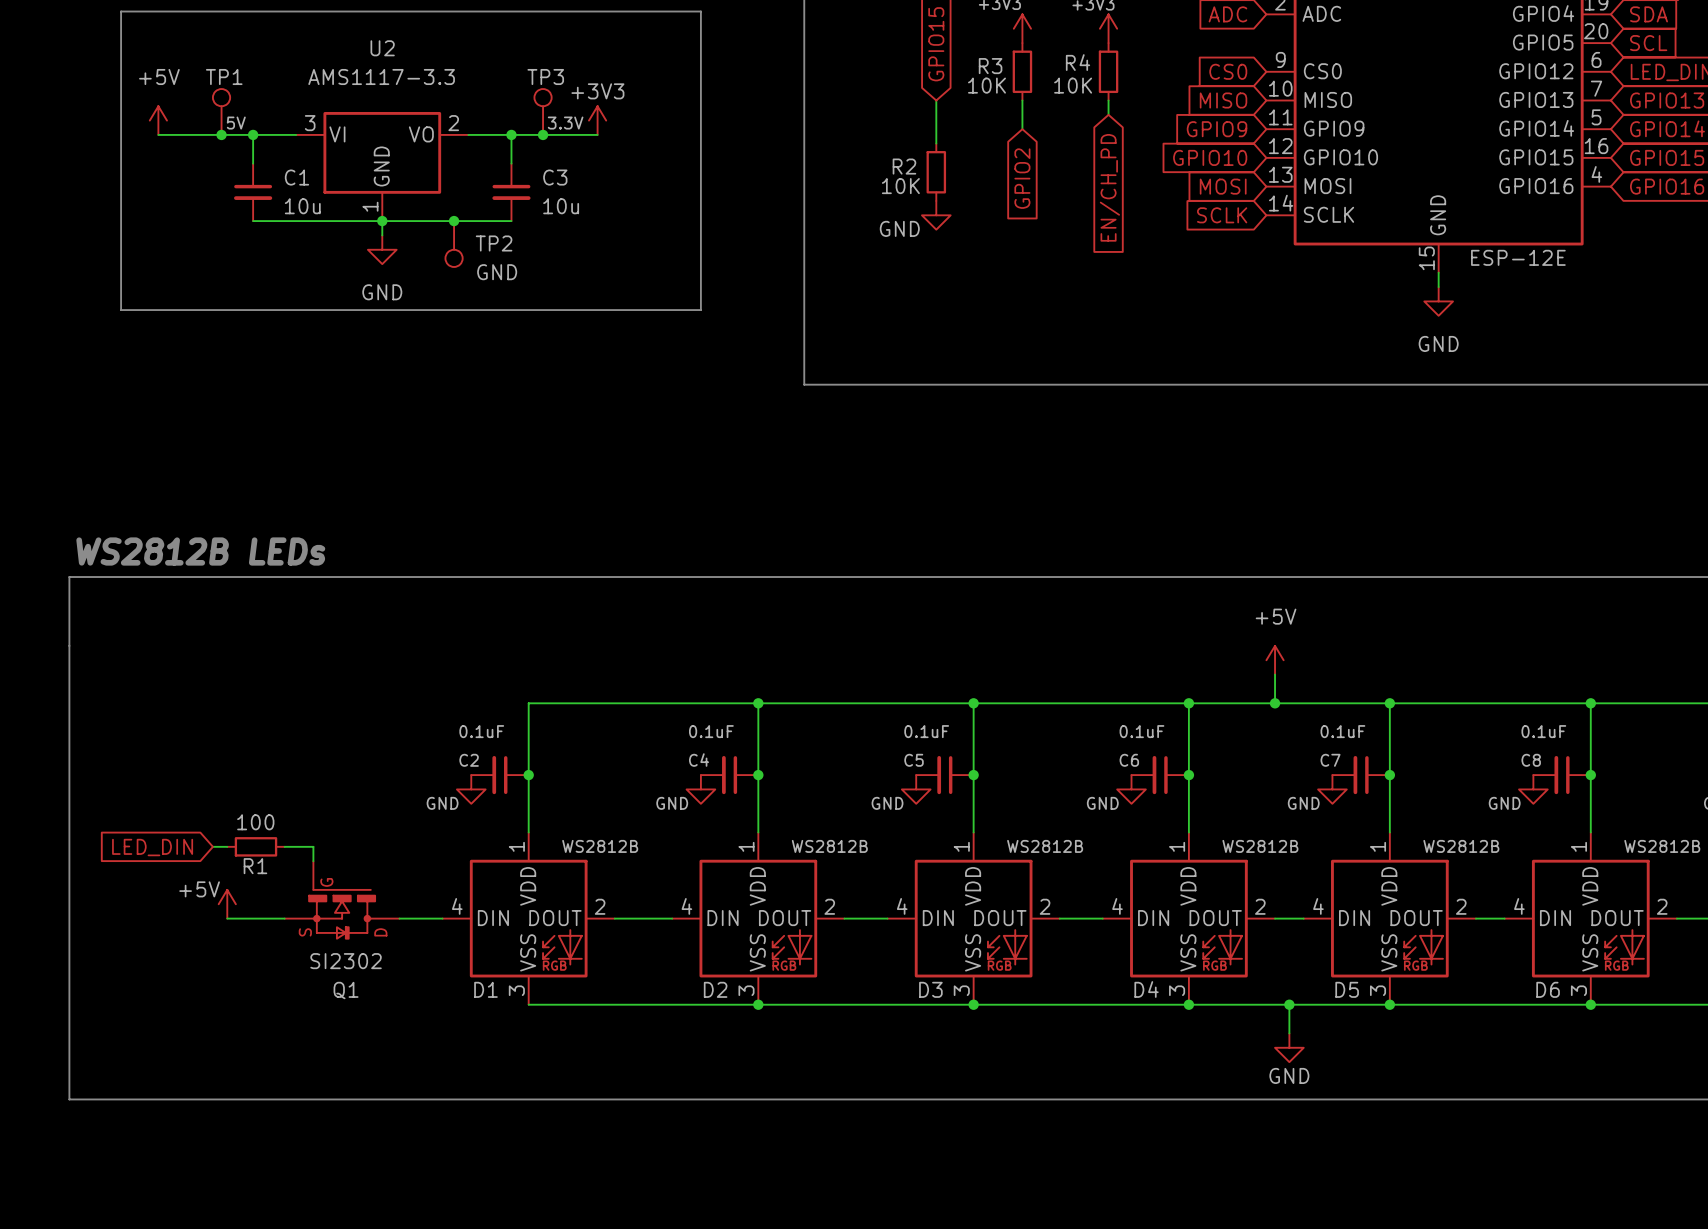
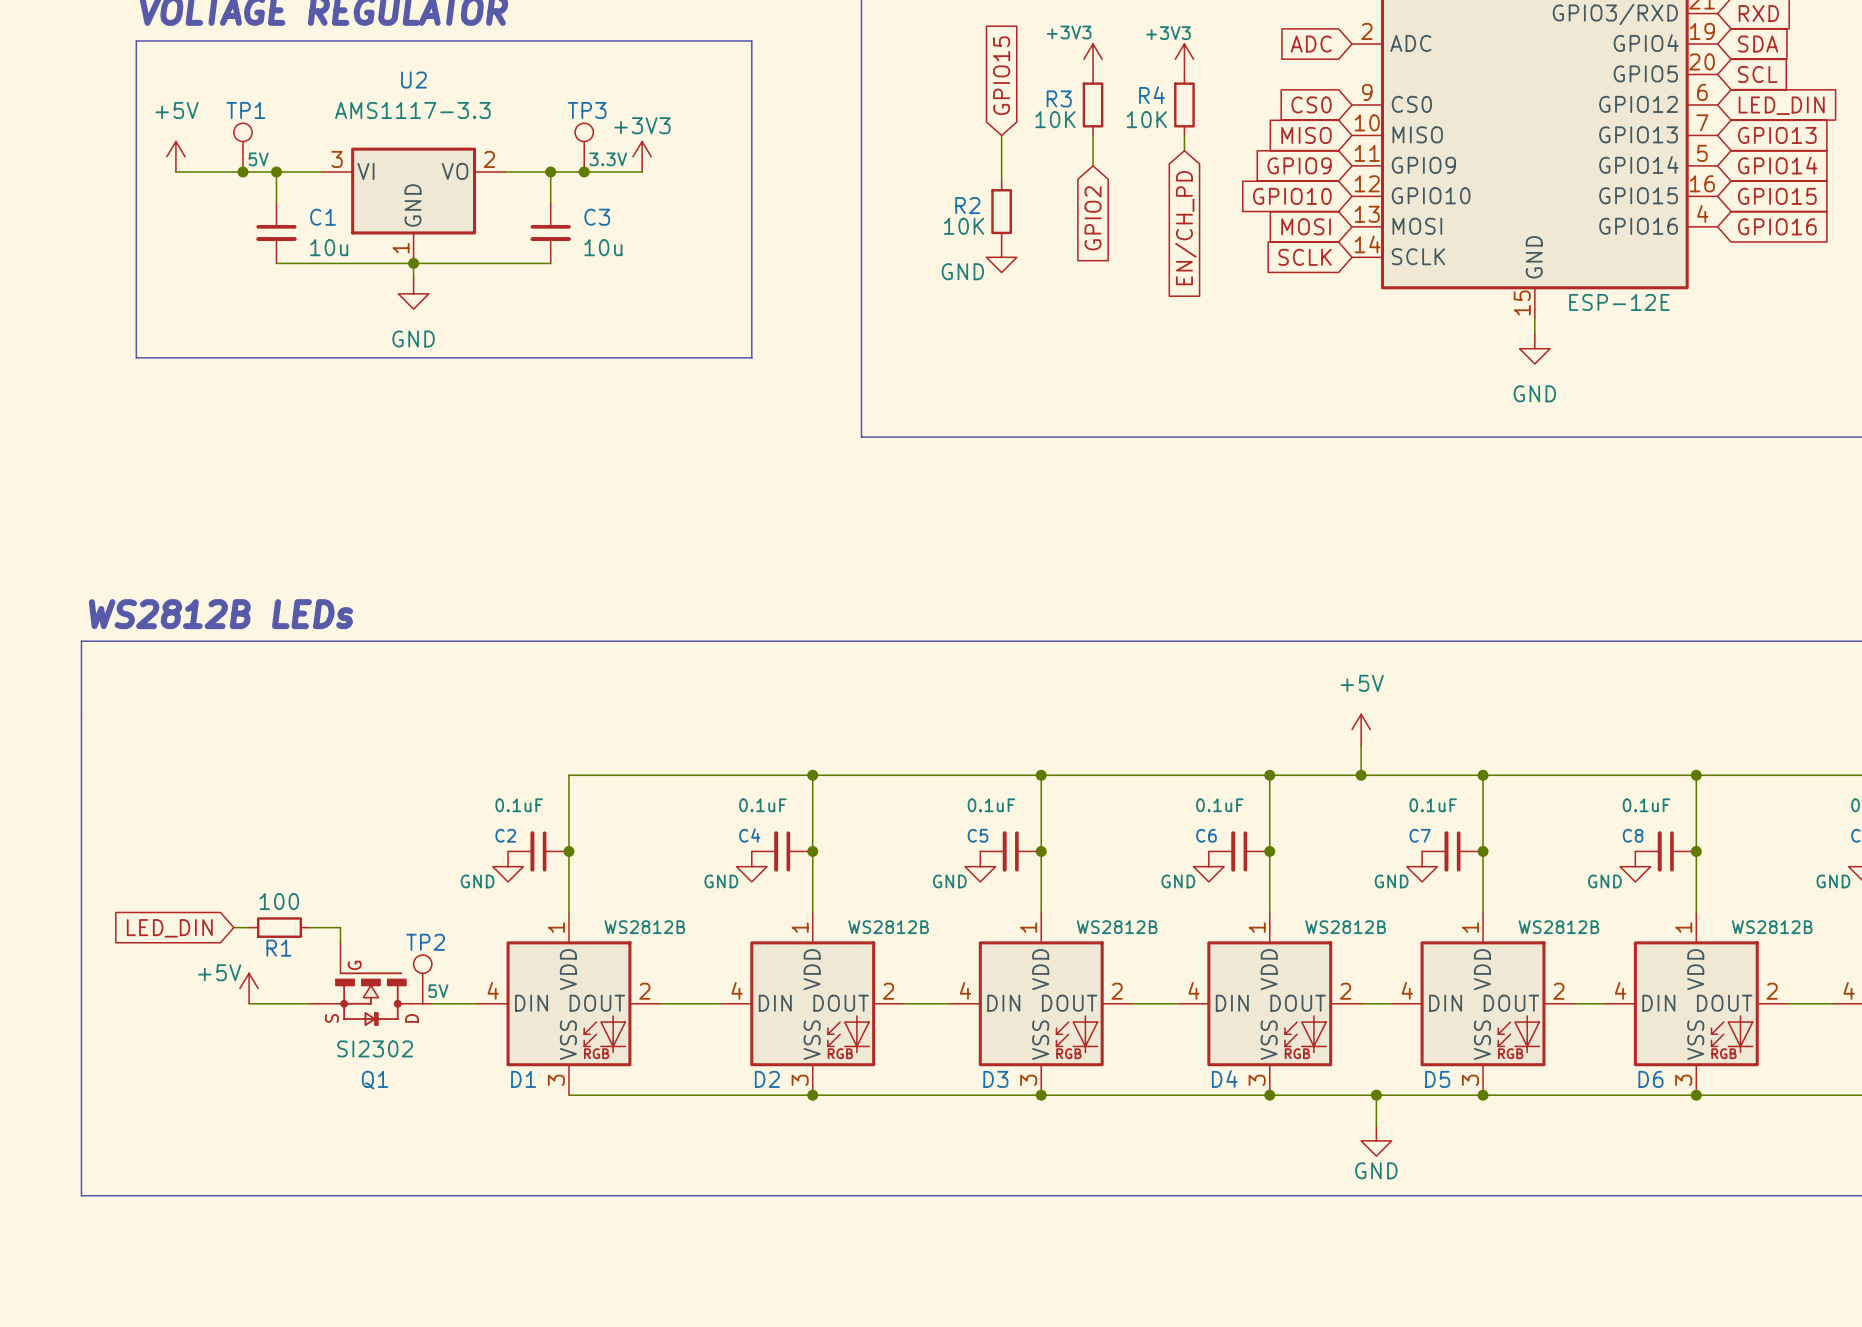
junction: (454, 221) -> none
TP2 name position: TP2 (494, 243) -> TP2 (425, 942)
TP2 position: (454, 244) -> (422, 979)
TP2 rotation: 0° (454, 258) -> 180° (422, 964)
TP2 value: GND (497, 272) -> 5V (438, 991)

